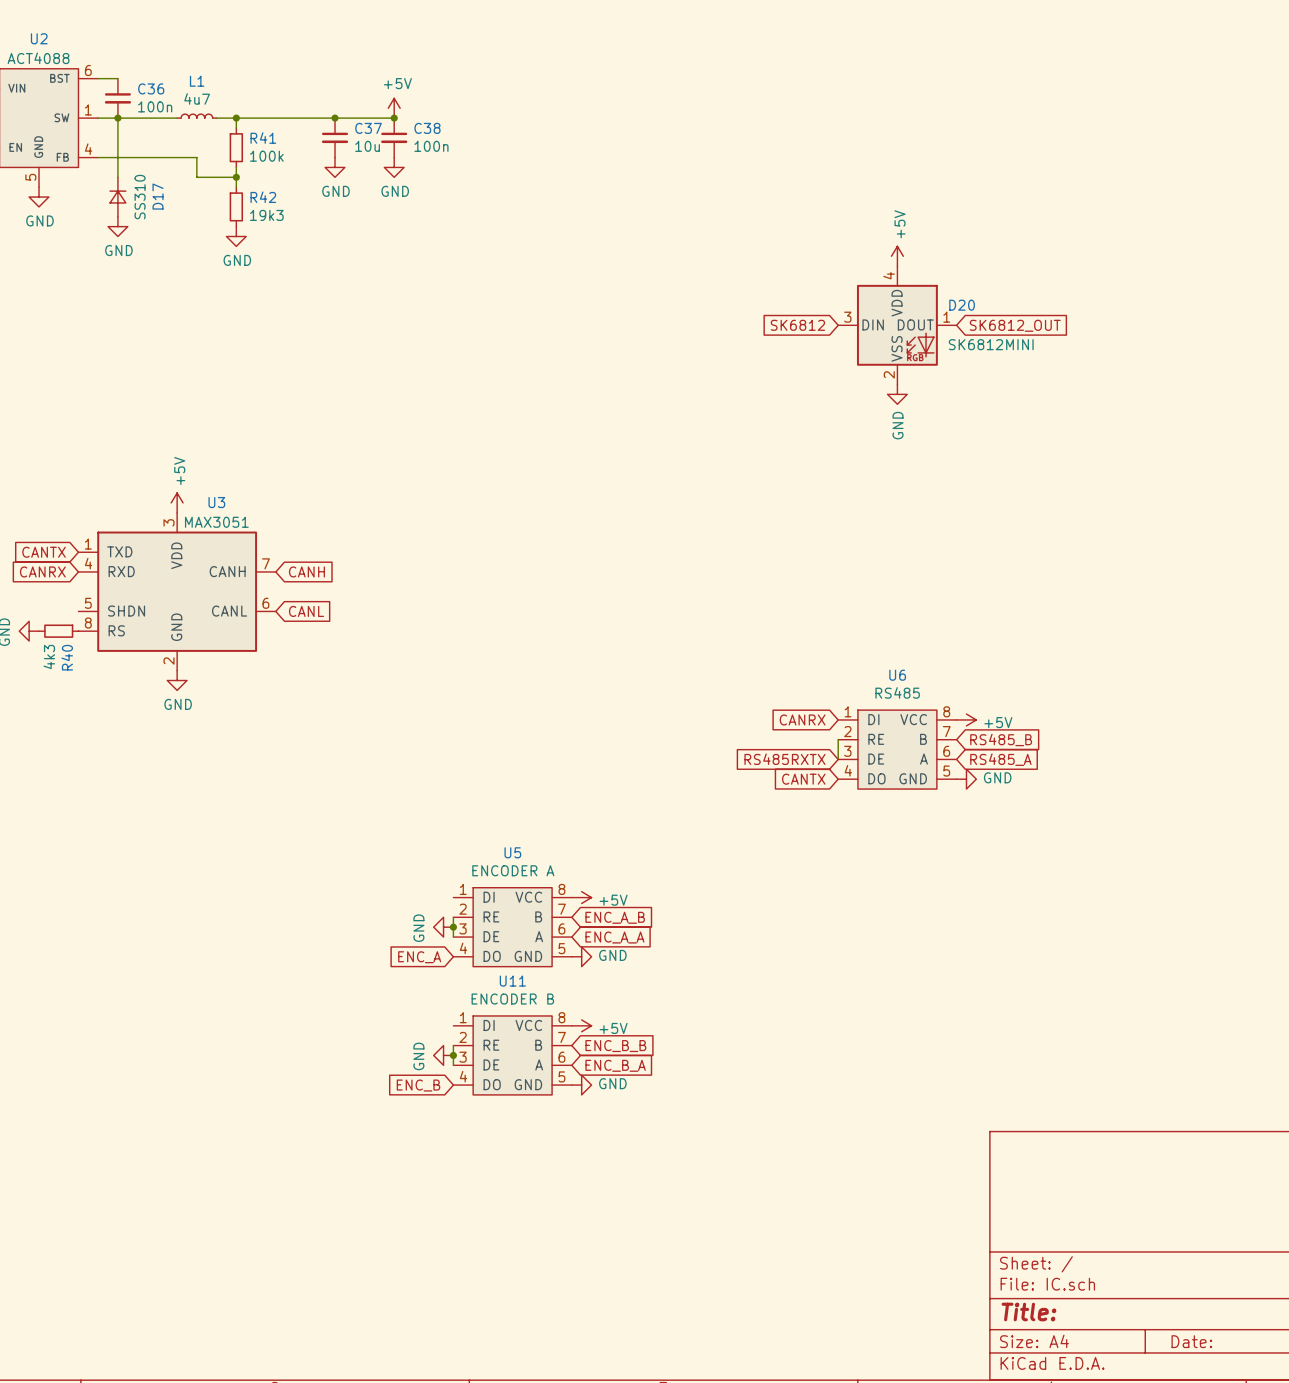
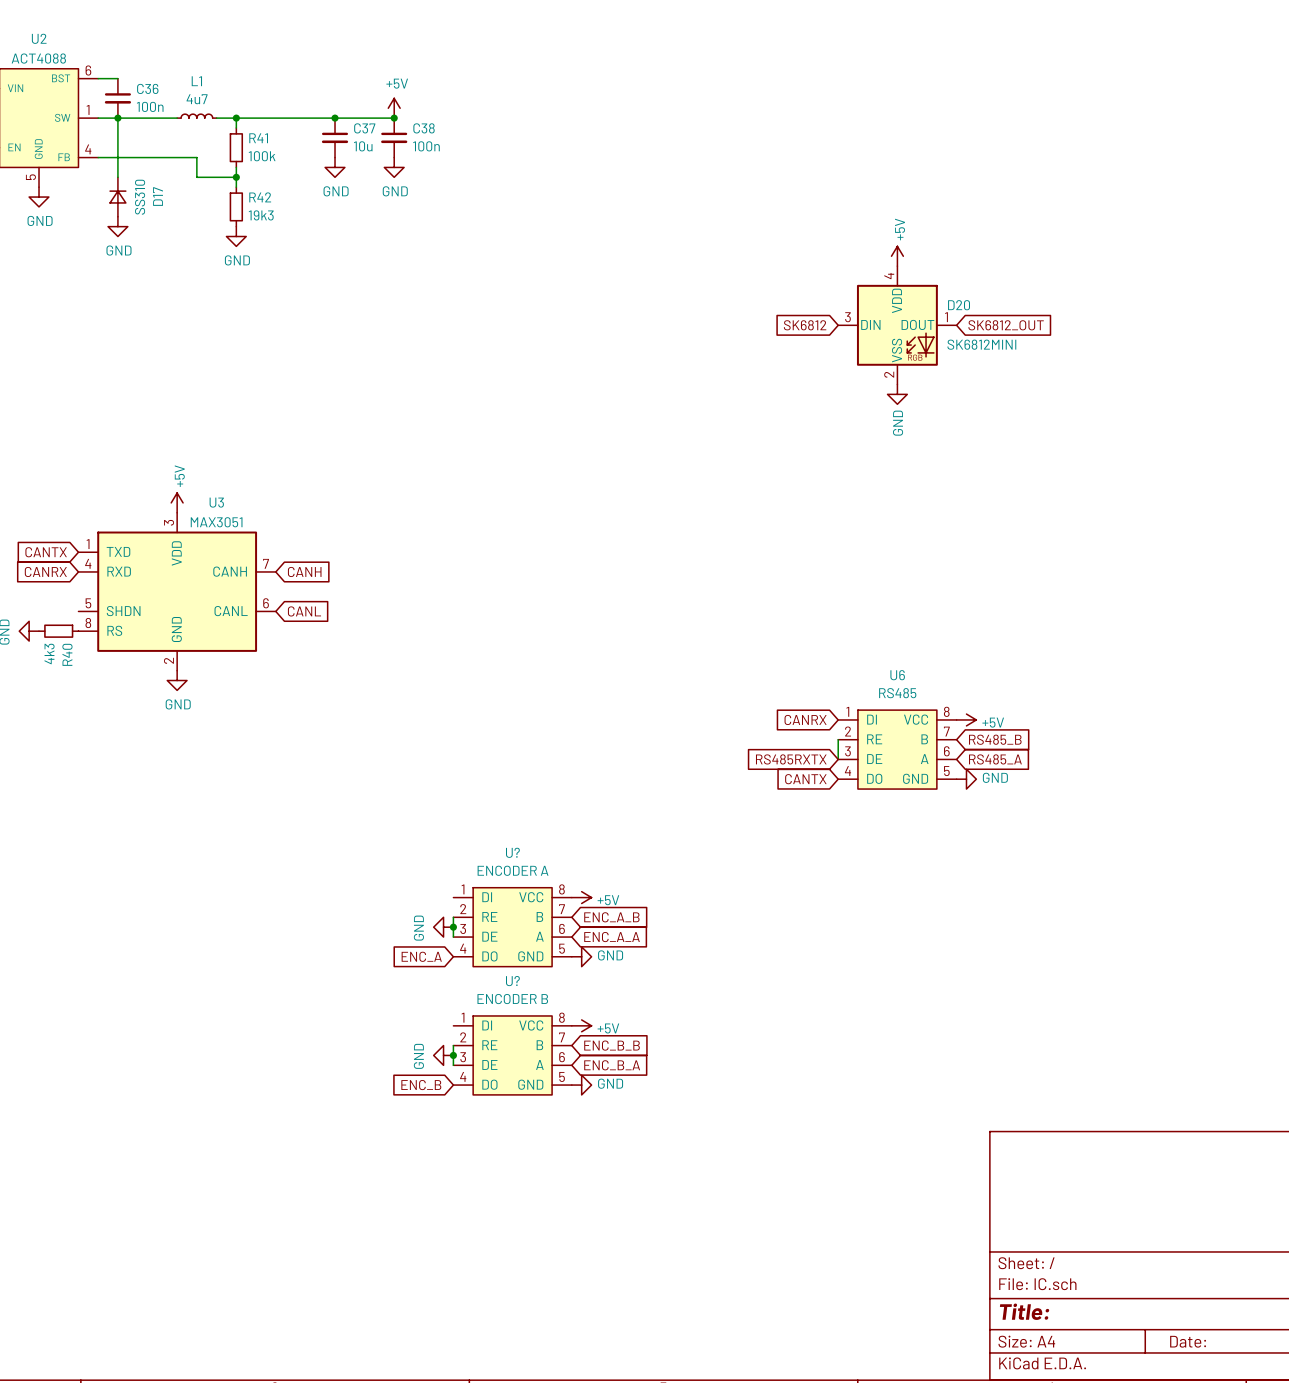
U5 name: U5 (512, 852) -> U? (512, 852)
U11 name: U11 (512, 981) -> U? (512, 981)

